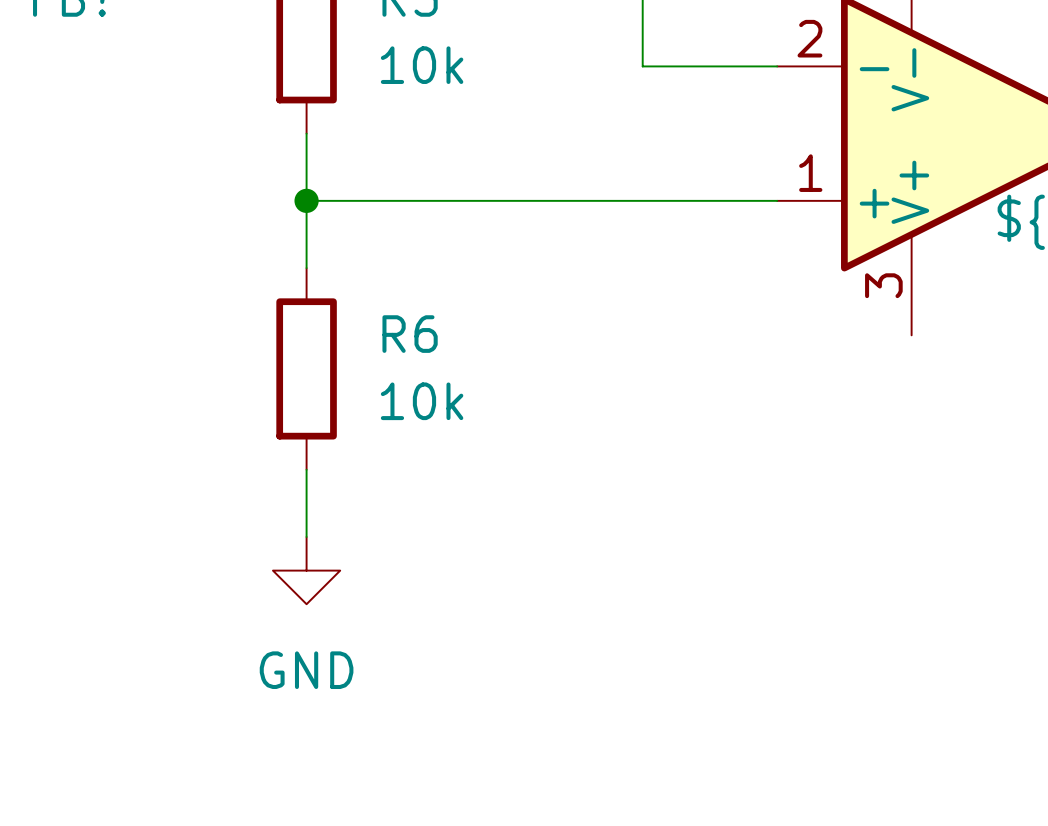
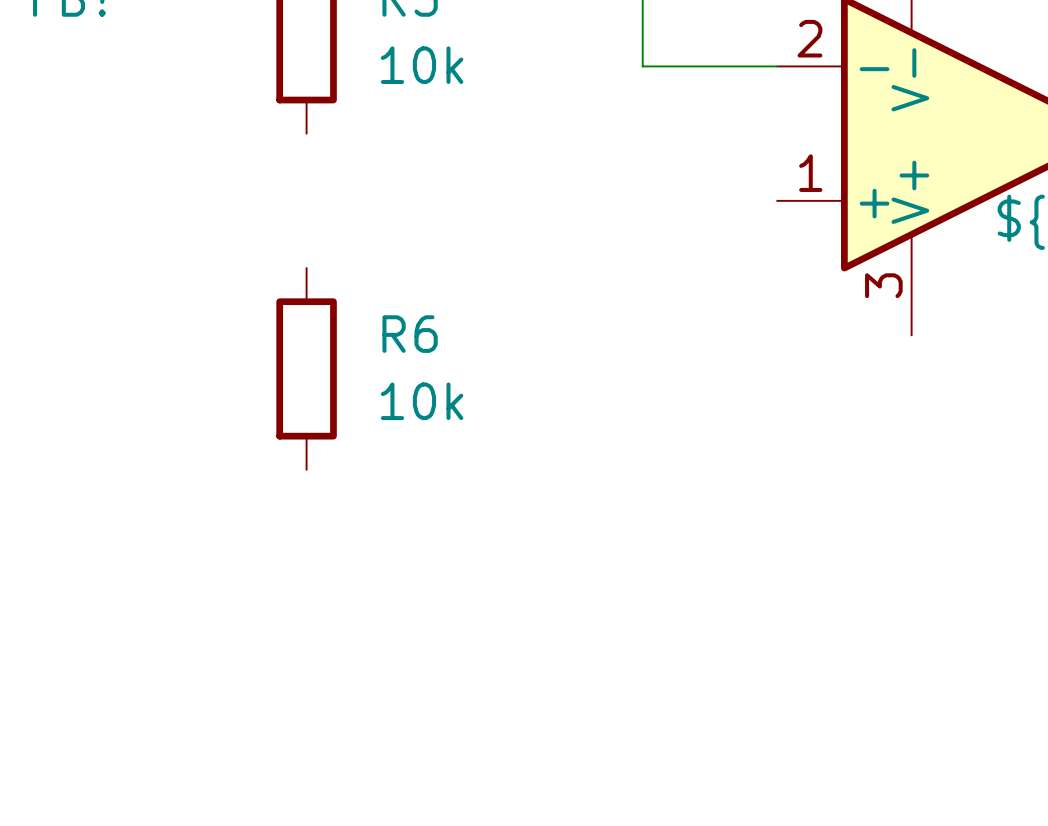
wire: (306, 133) (306, 268) -> none
wire: (306, 200) (777, 200) -> none
junction: (306, 200) -> none
wire: (306, 469) (306, 536) -> none
power symbol: GND (306, 570) -> none

